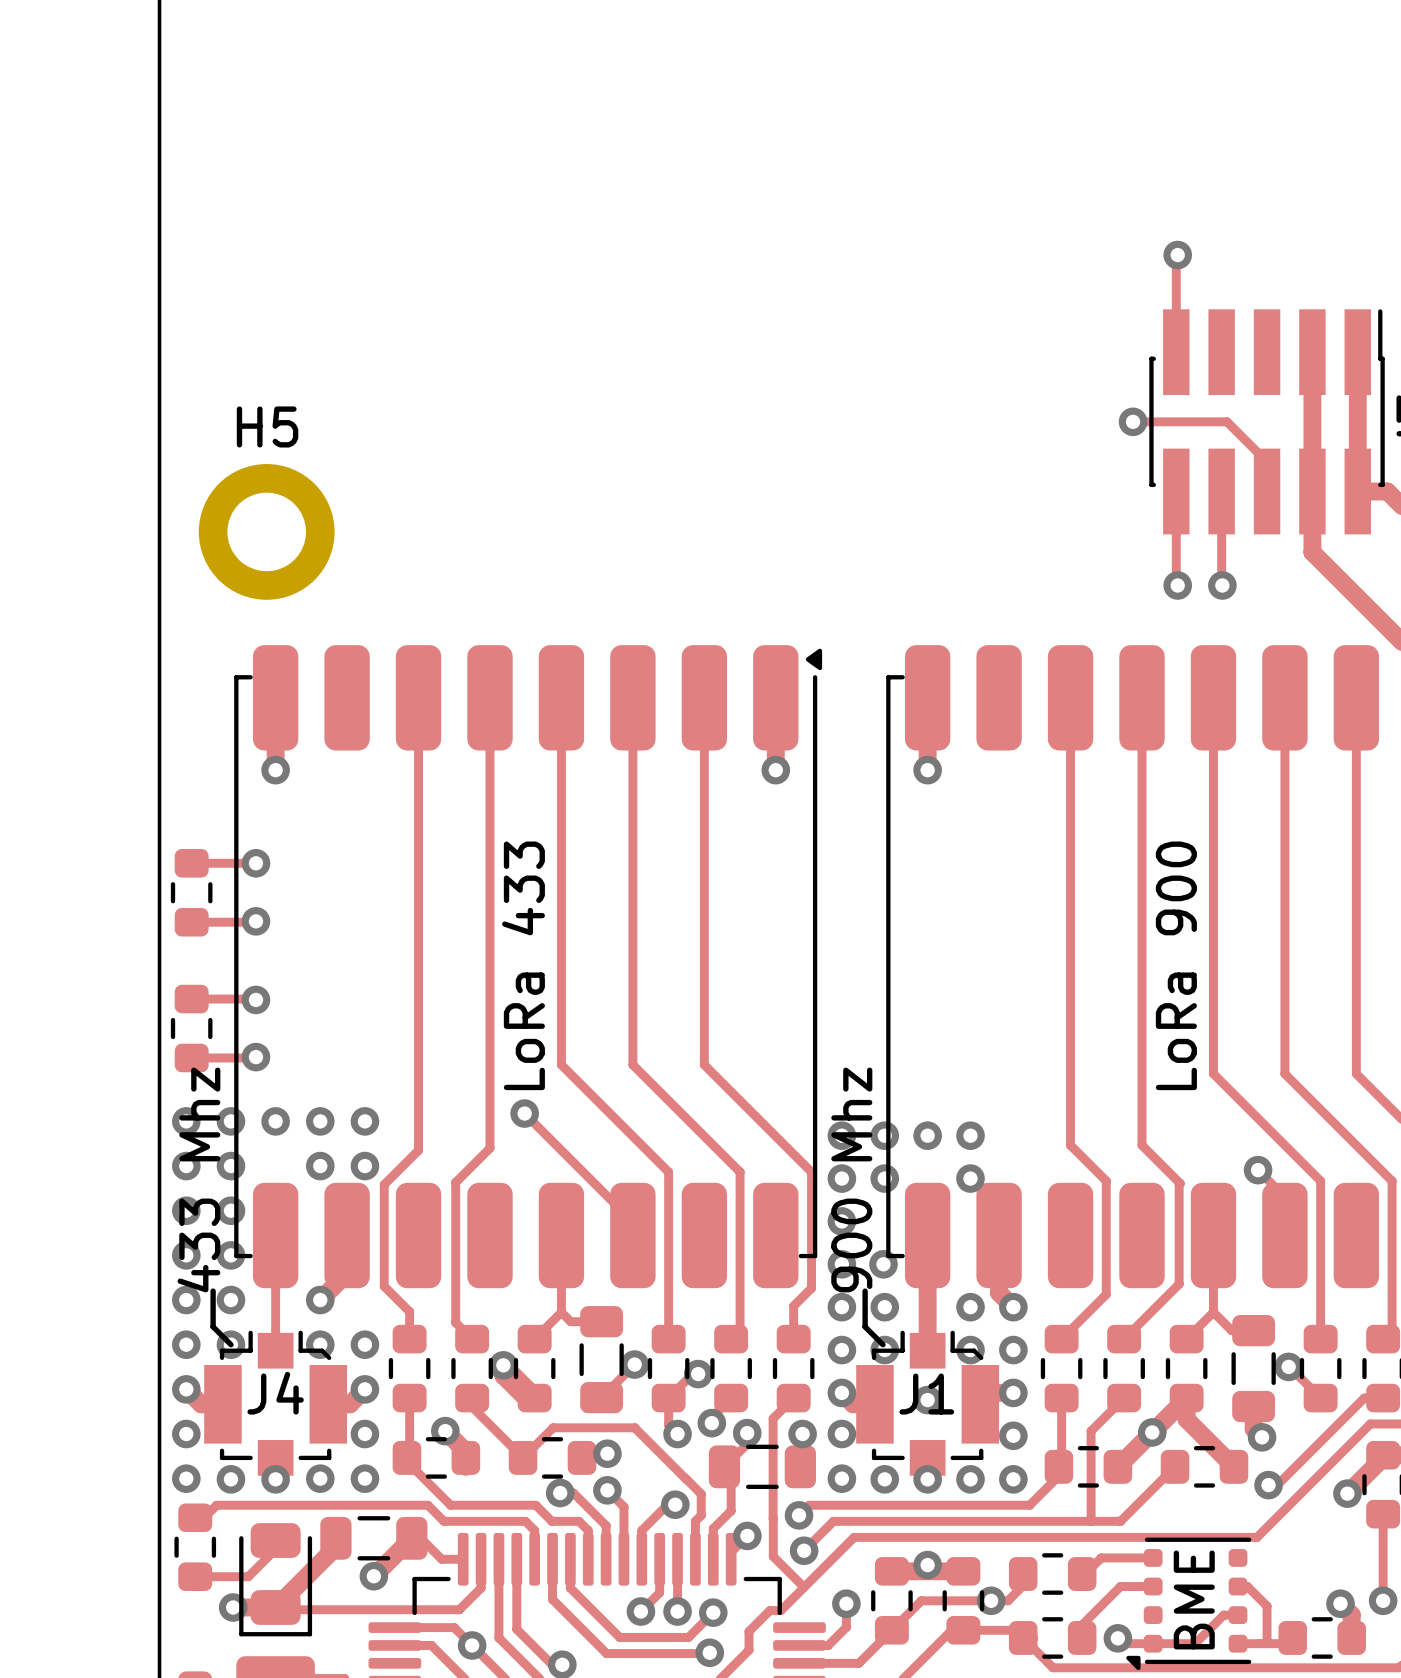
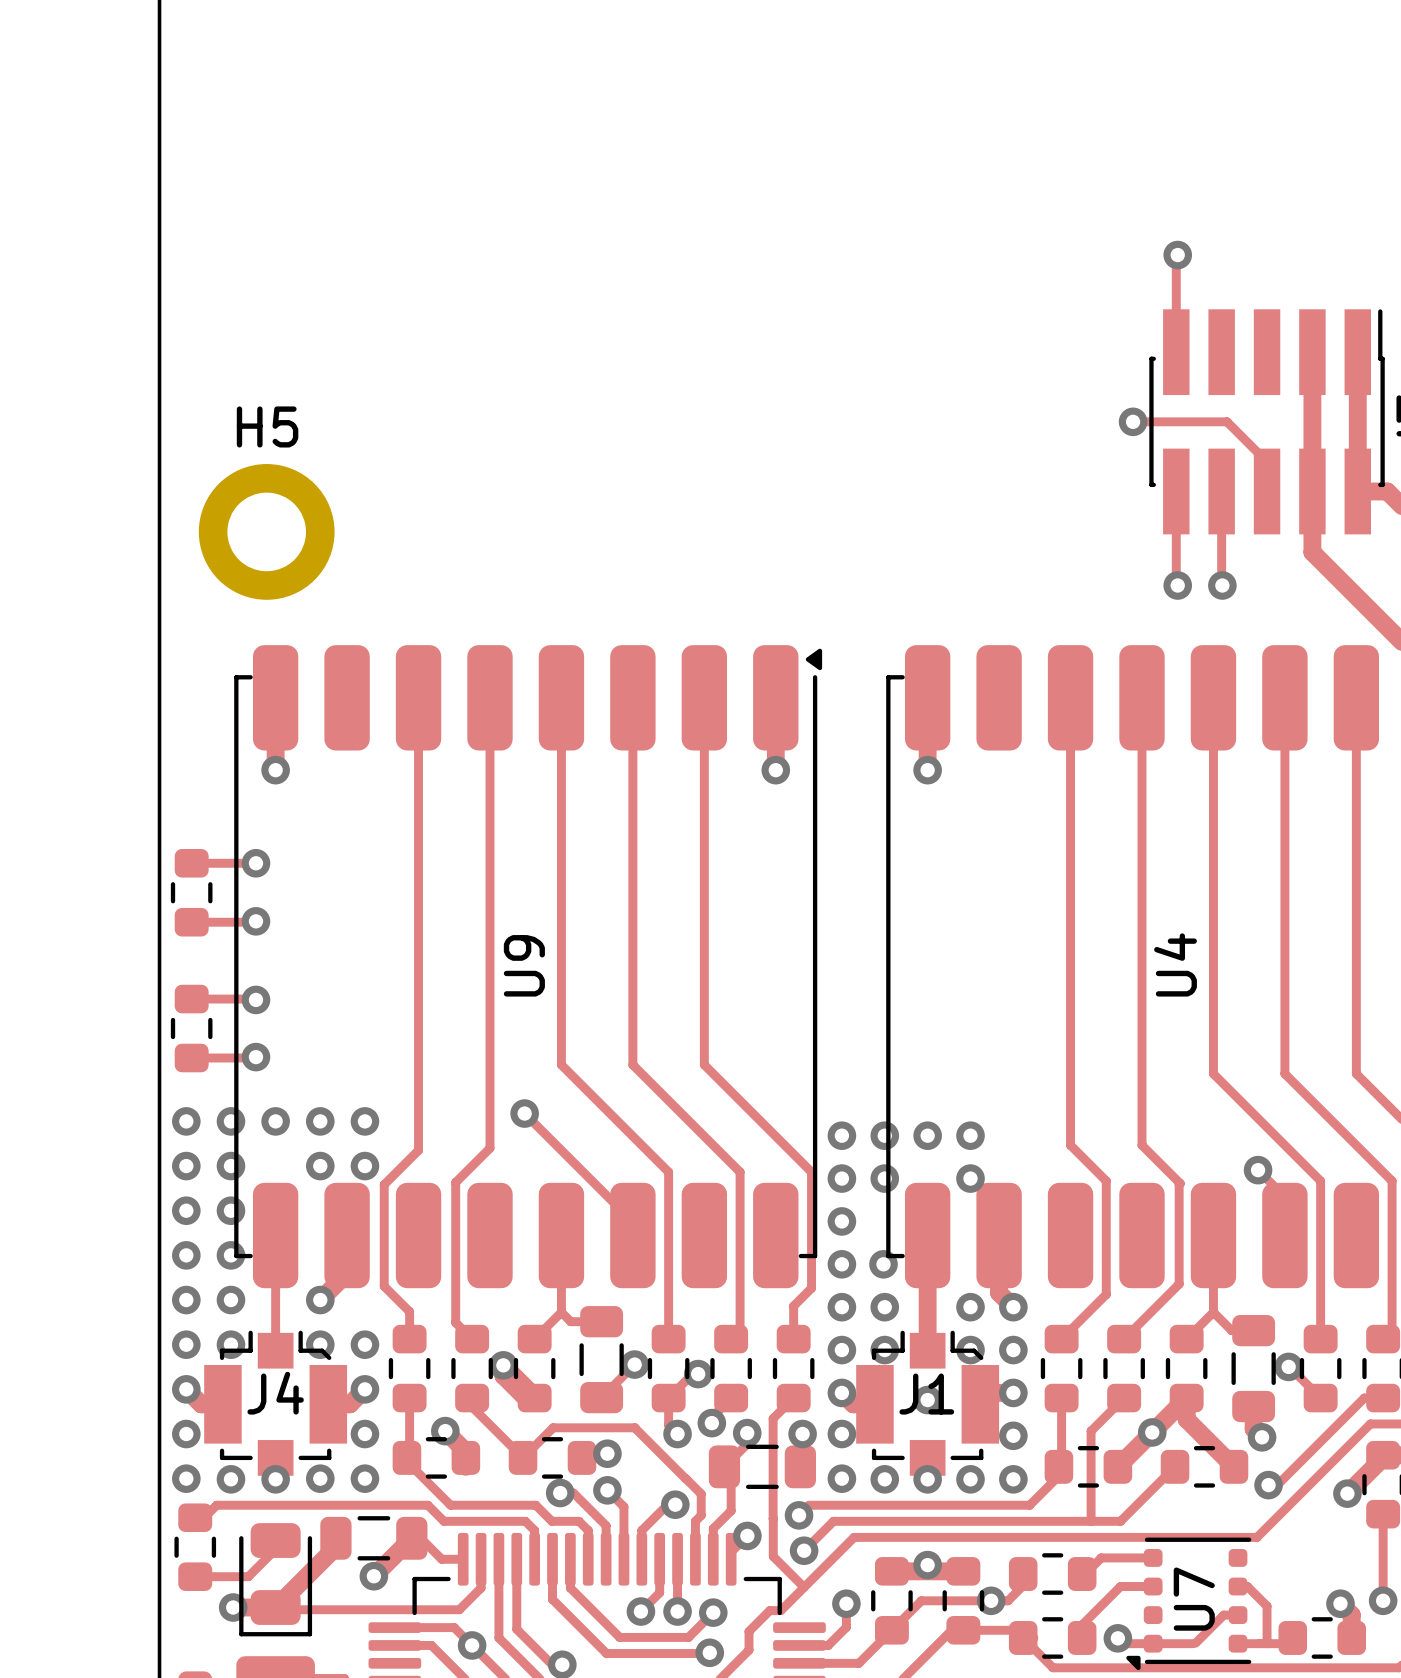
LoRa 433 name: LoRa 433 (523, 965) -> U9 (524, 965)
LoRa 900 name: LoRa 900 (1176, 965) -> U4 (1175, 964)
text: 433 Mhz (198, 1179) -> none
text: 900 Mhz (851, 1179) -> none
line: (213, 1291) (213, 1326) (230, 1344) -> none
line: (865, 1291) (865, 1326) (882, 1344) -> none
BME name: BME (1194, 1599) -> U7 (1194, 1599)

